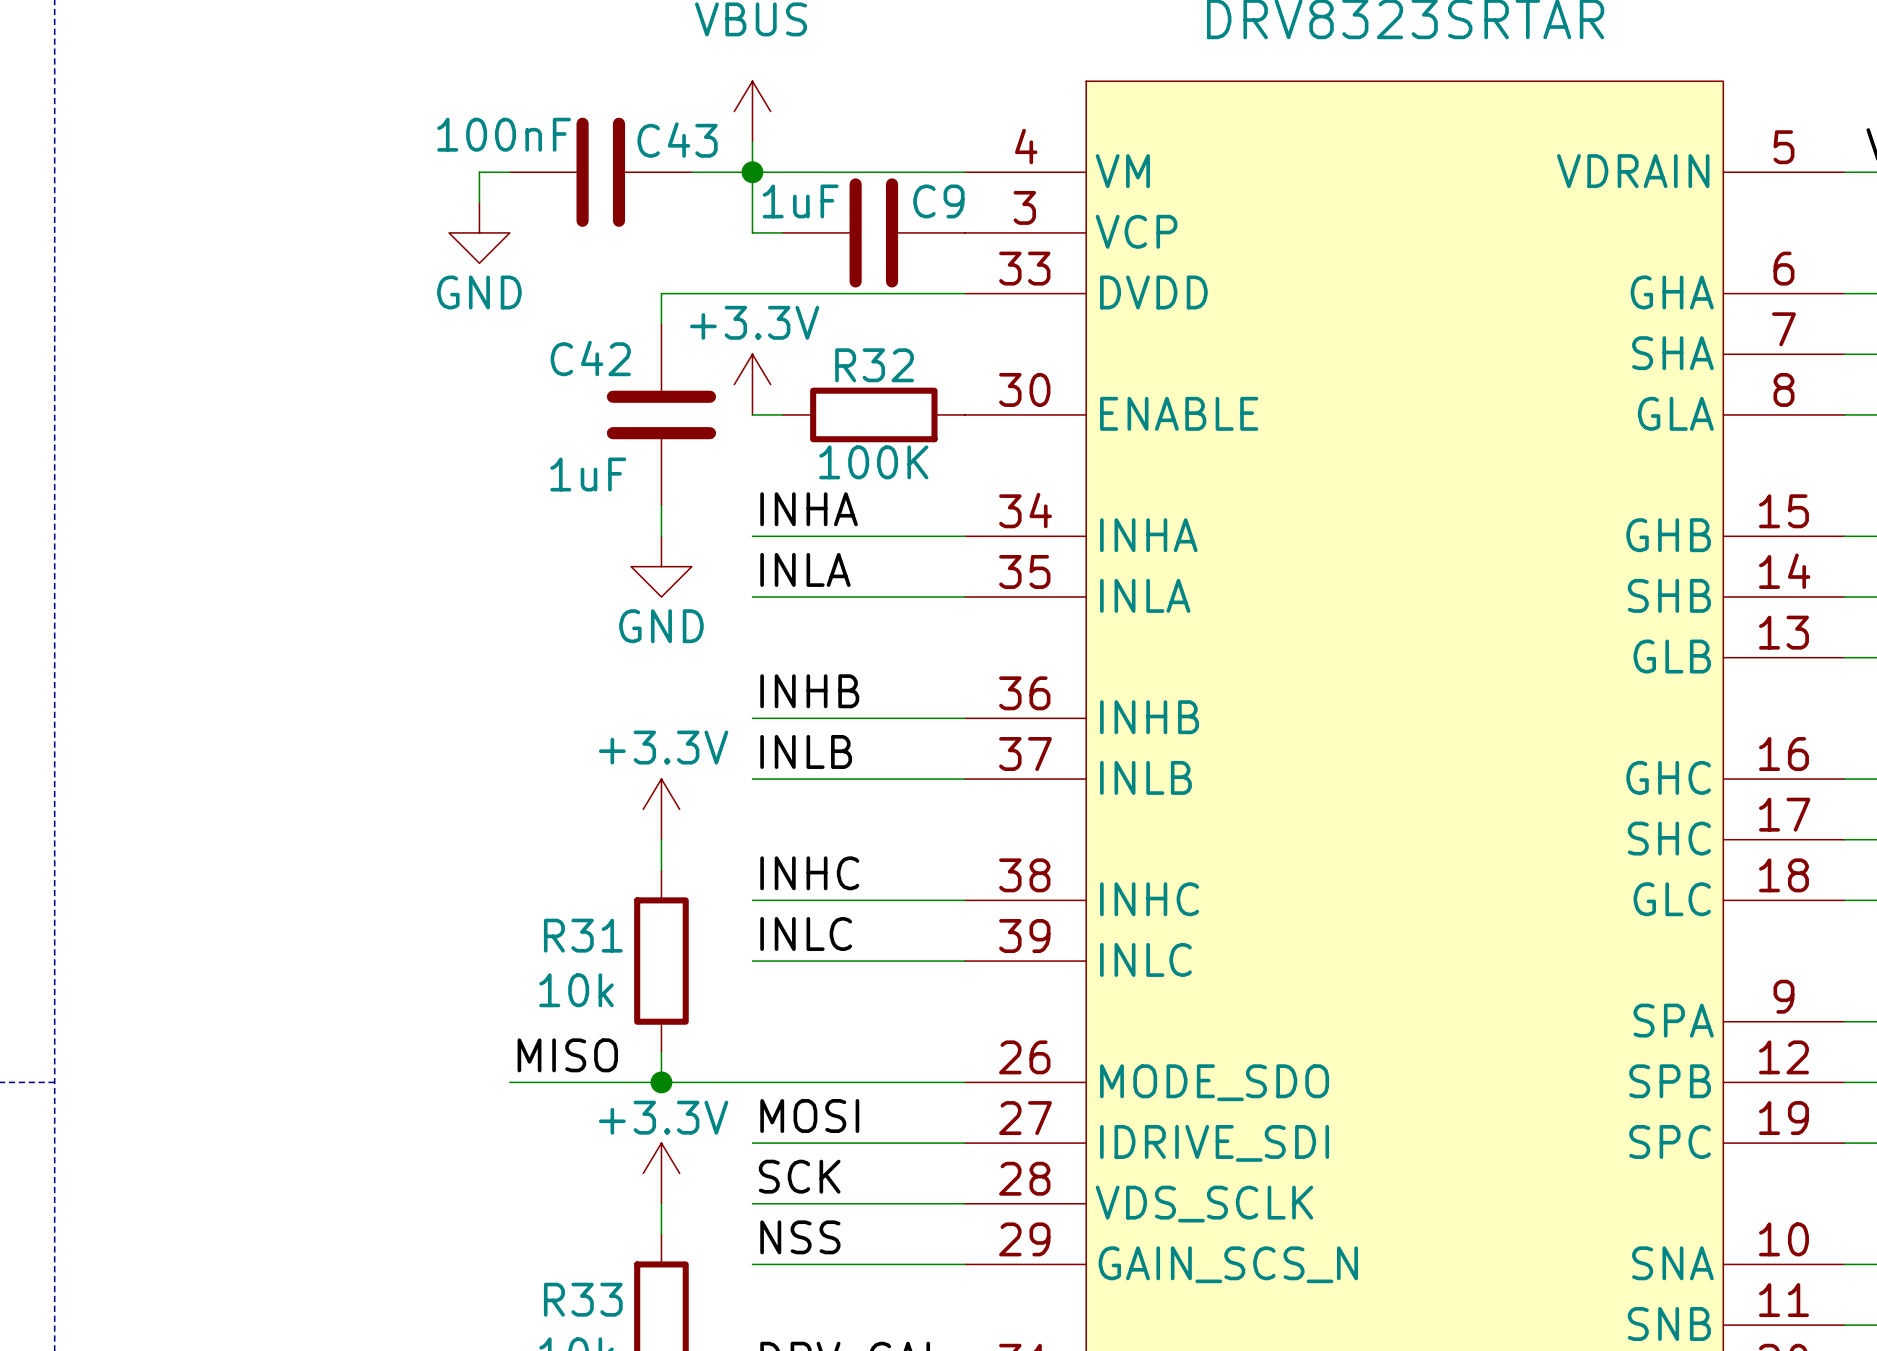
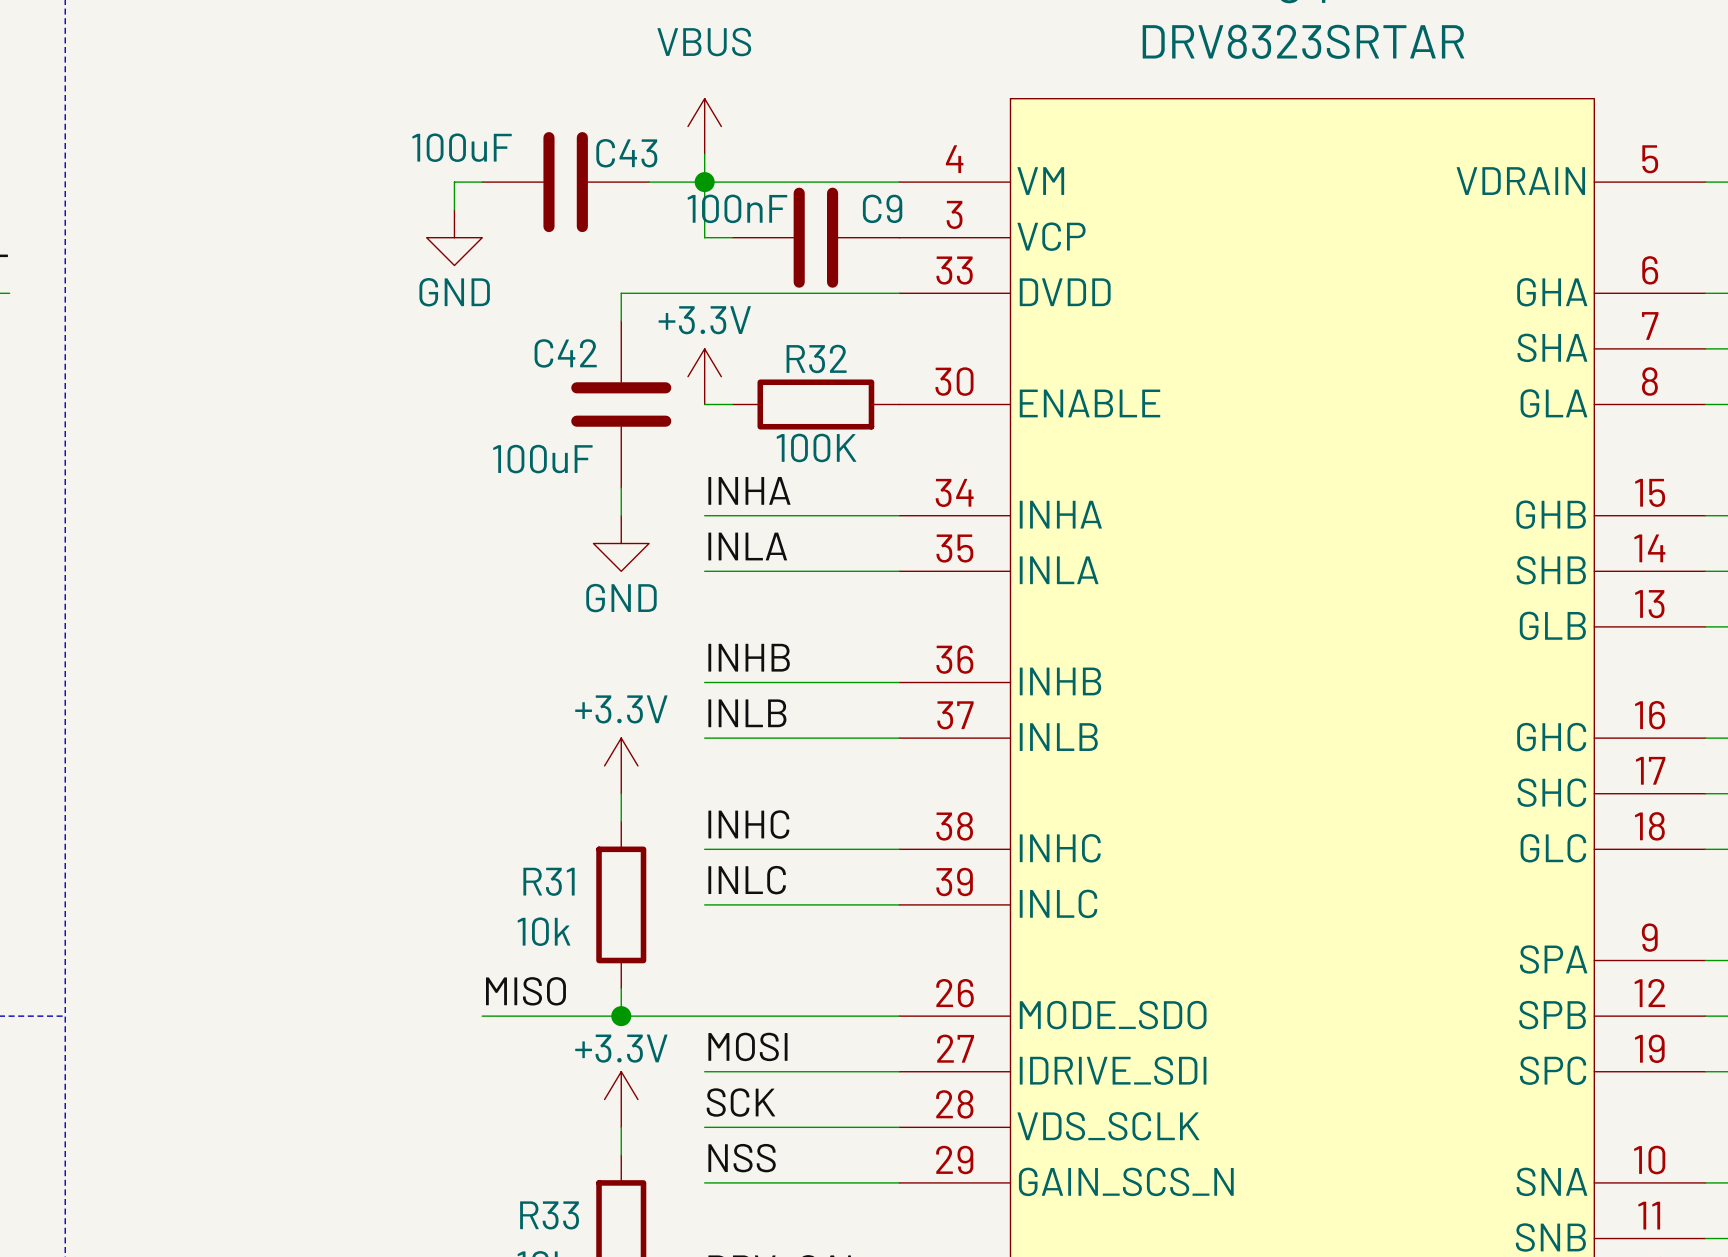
C43 value: 100nF (504, 134) -> 100uF (462, 147)
C9 value: 1uF (800, 201) -> 100nF (737, 208)
C42 value: 1uF (588, 474) -> 100uF (542, 459)

